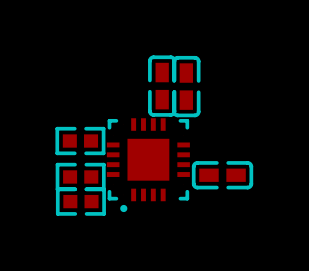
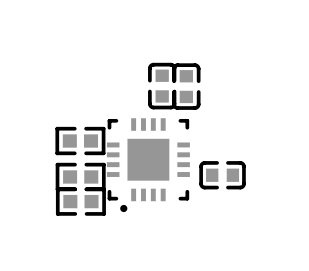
part footprint: [148, 55, 177, 117] -> [148, 62, 177, 110]
part footprint: [172, 55, 201, 118] -> [172, 63, 201, 110]
part footprint: [191, 161, 254, 190] -> [199, 161, 246, 190]

